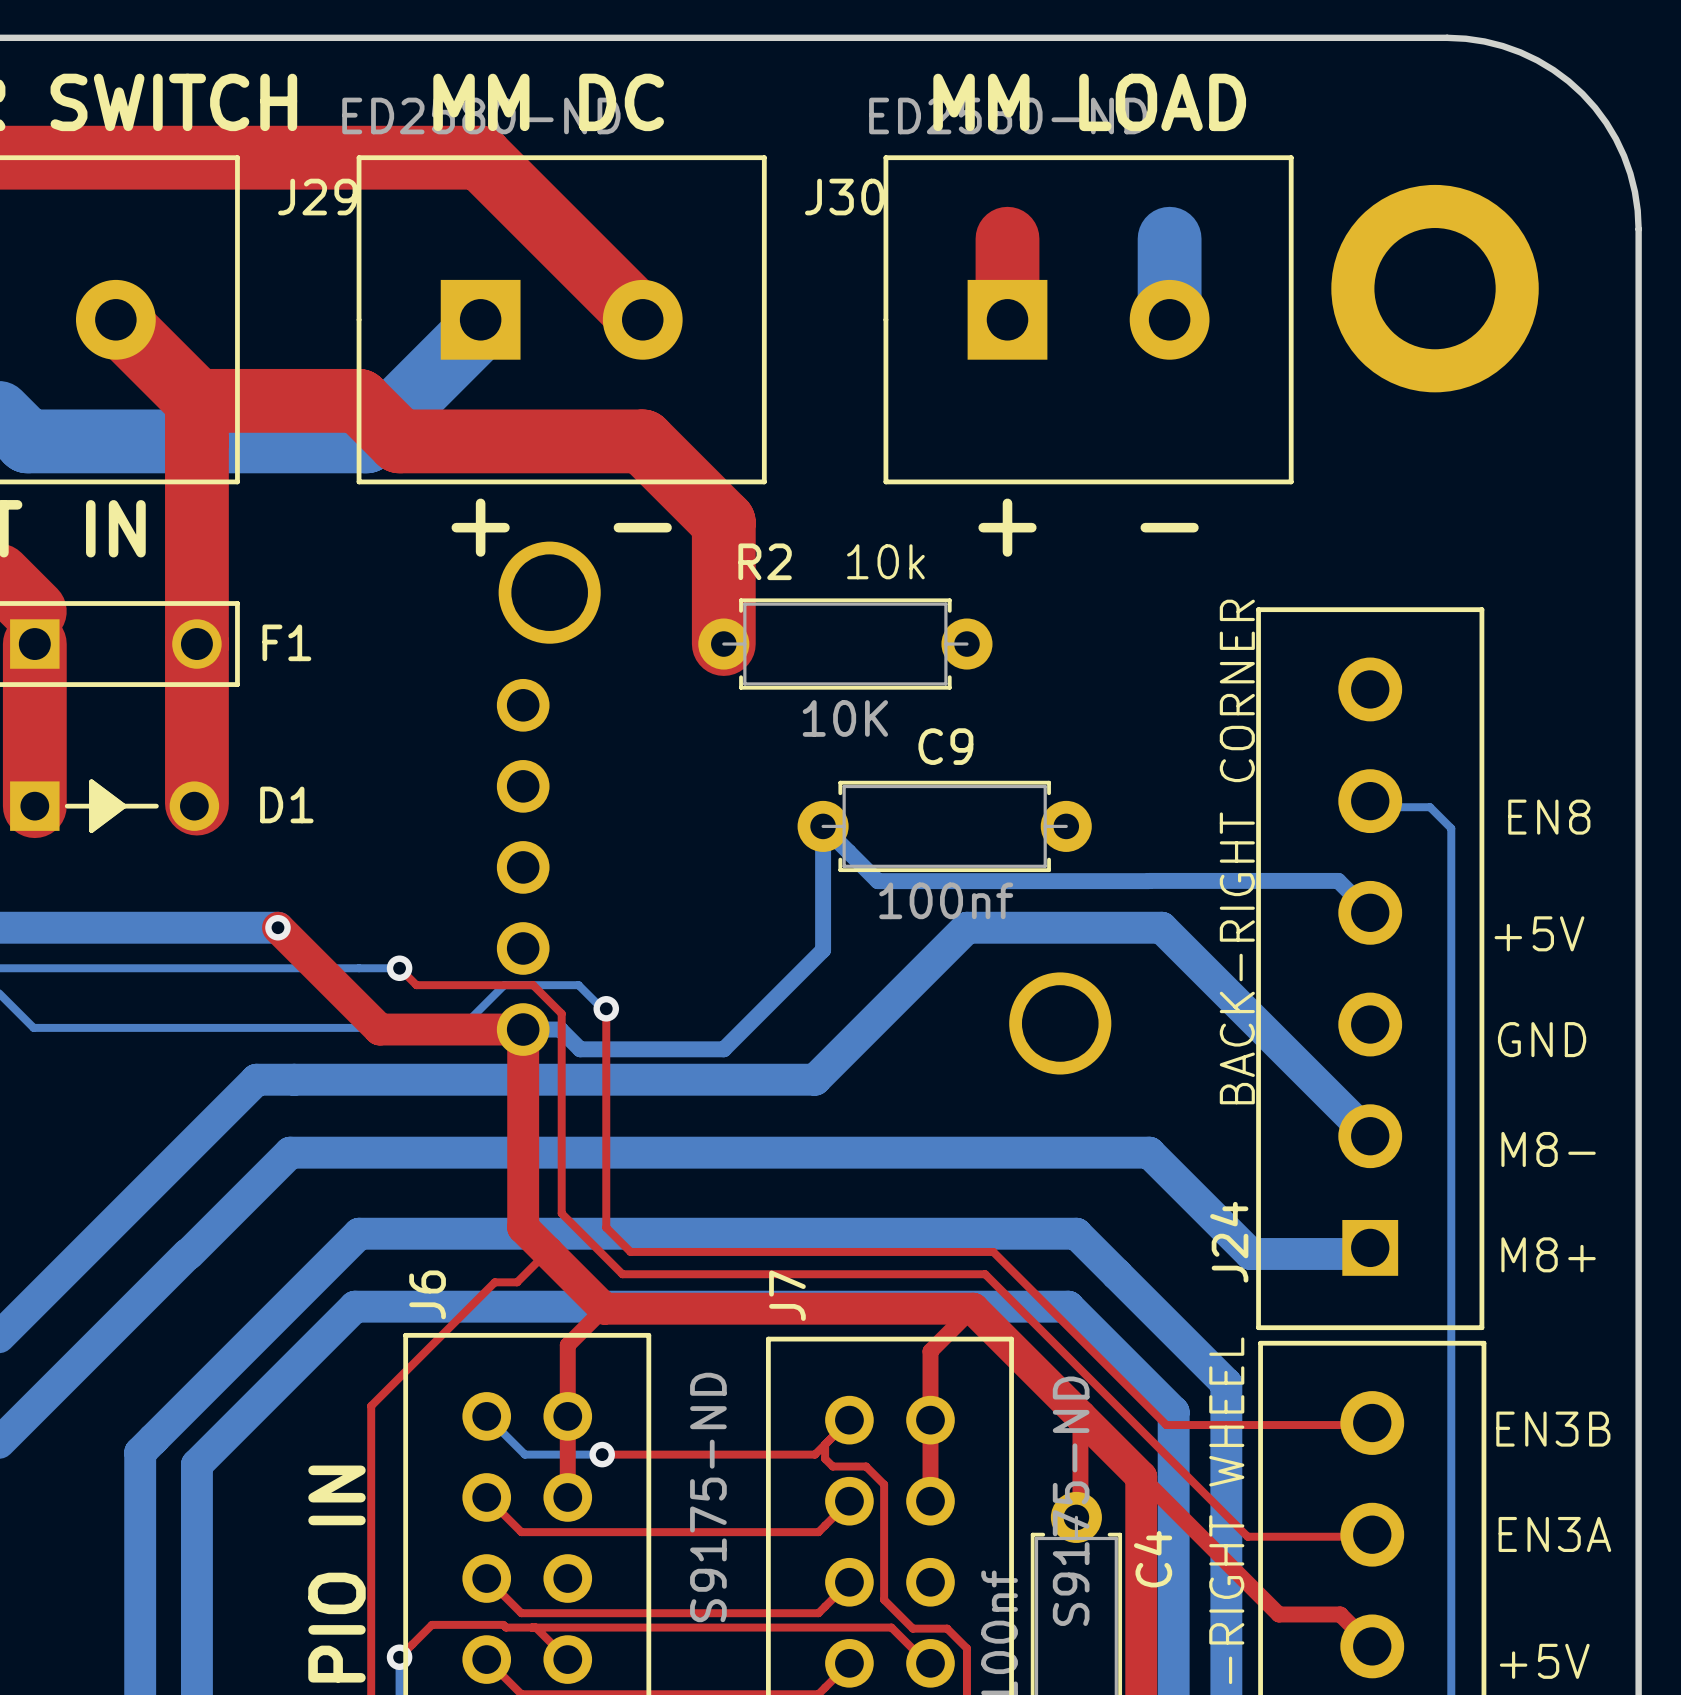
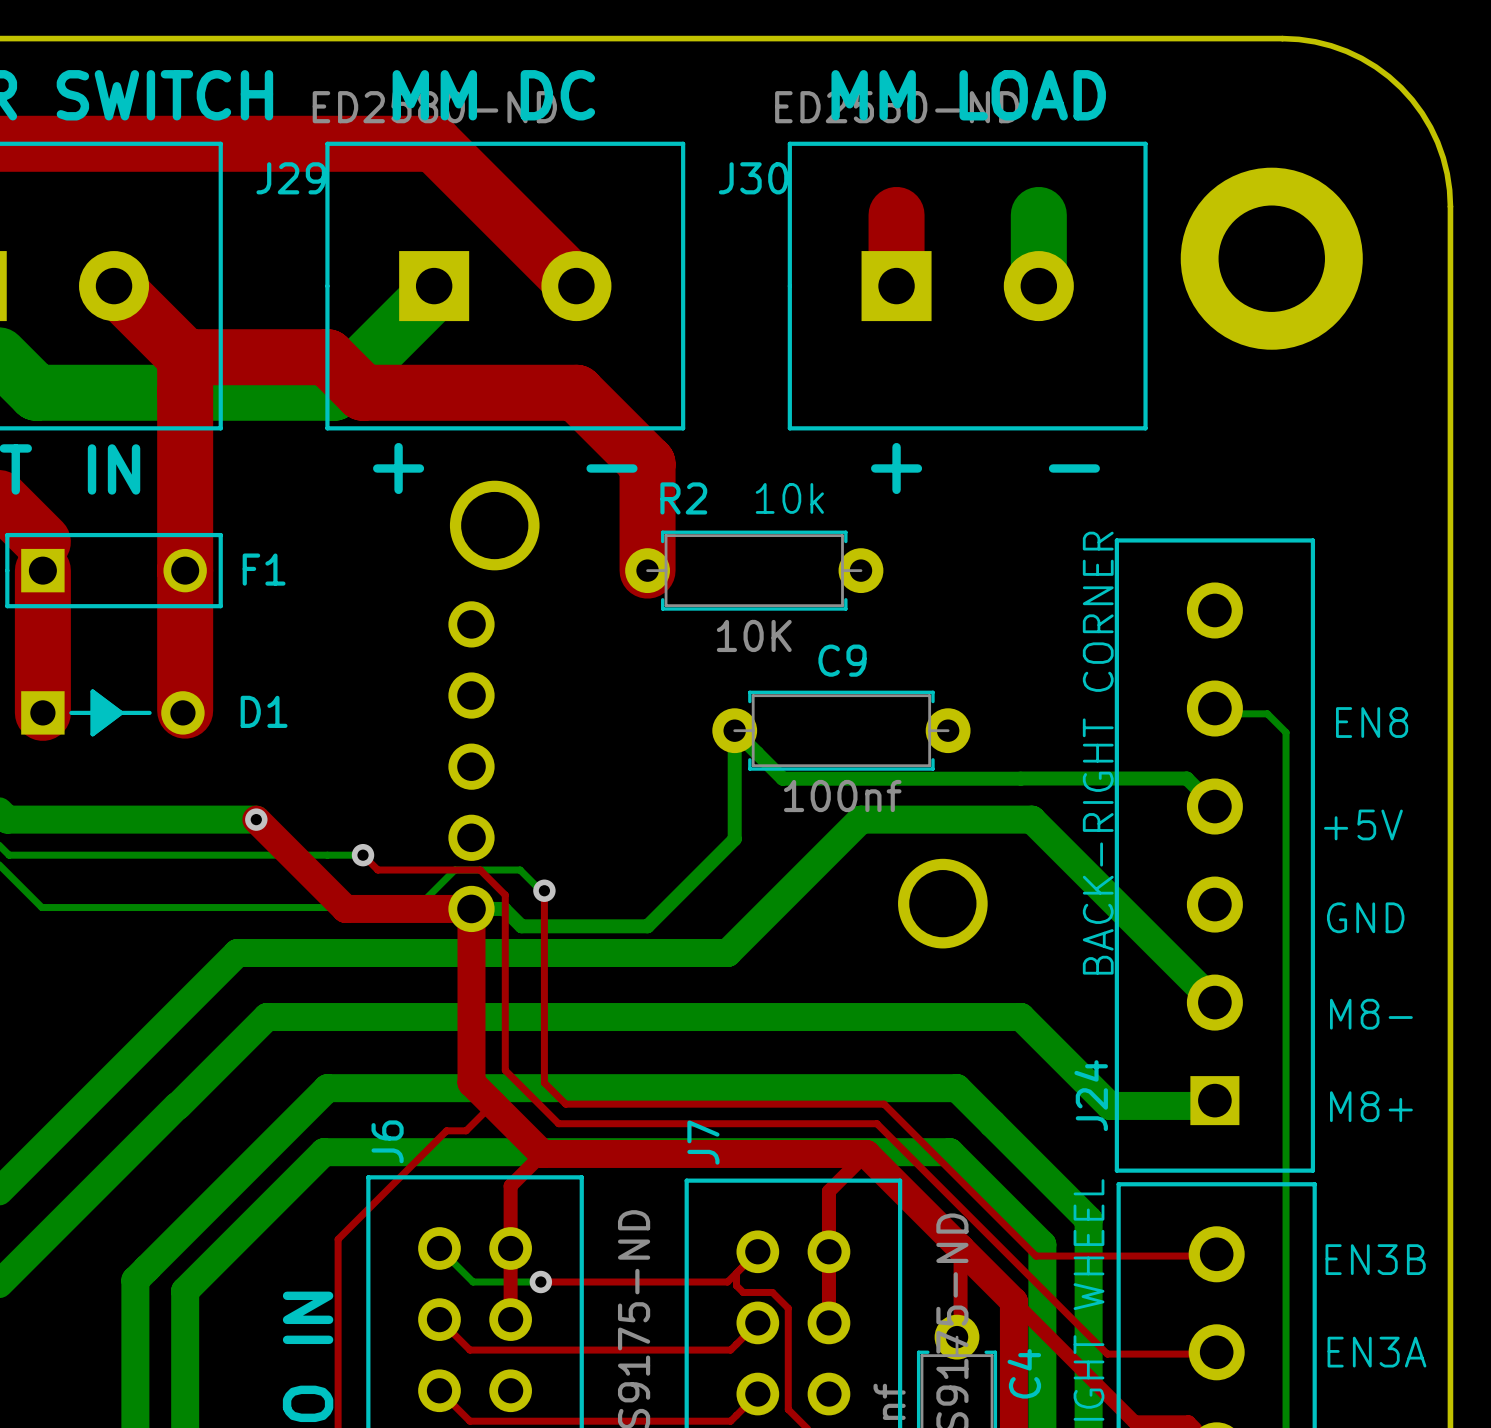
text position: + (480, 527) -> + (398, 468)
text position: - (642, 527) -> - (611, 468)
text position: - (1169, 527) -> - (1074, 468)

